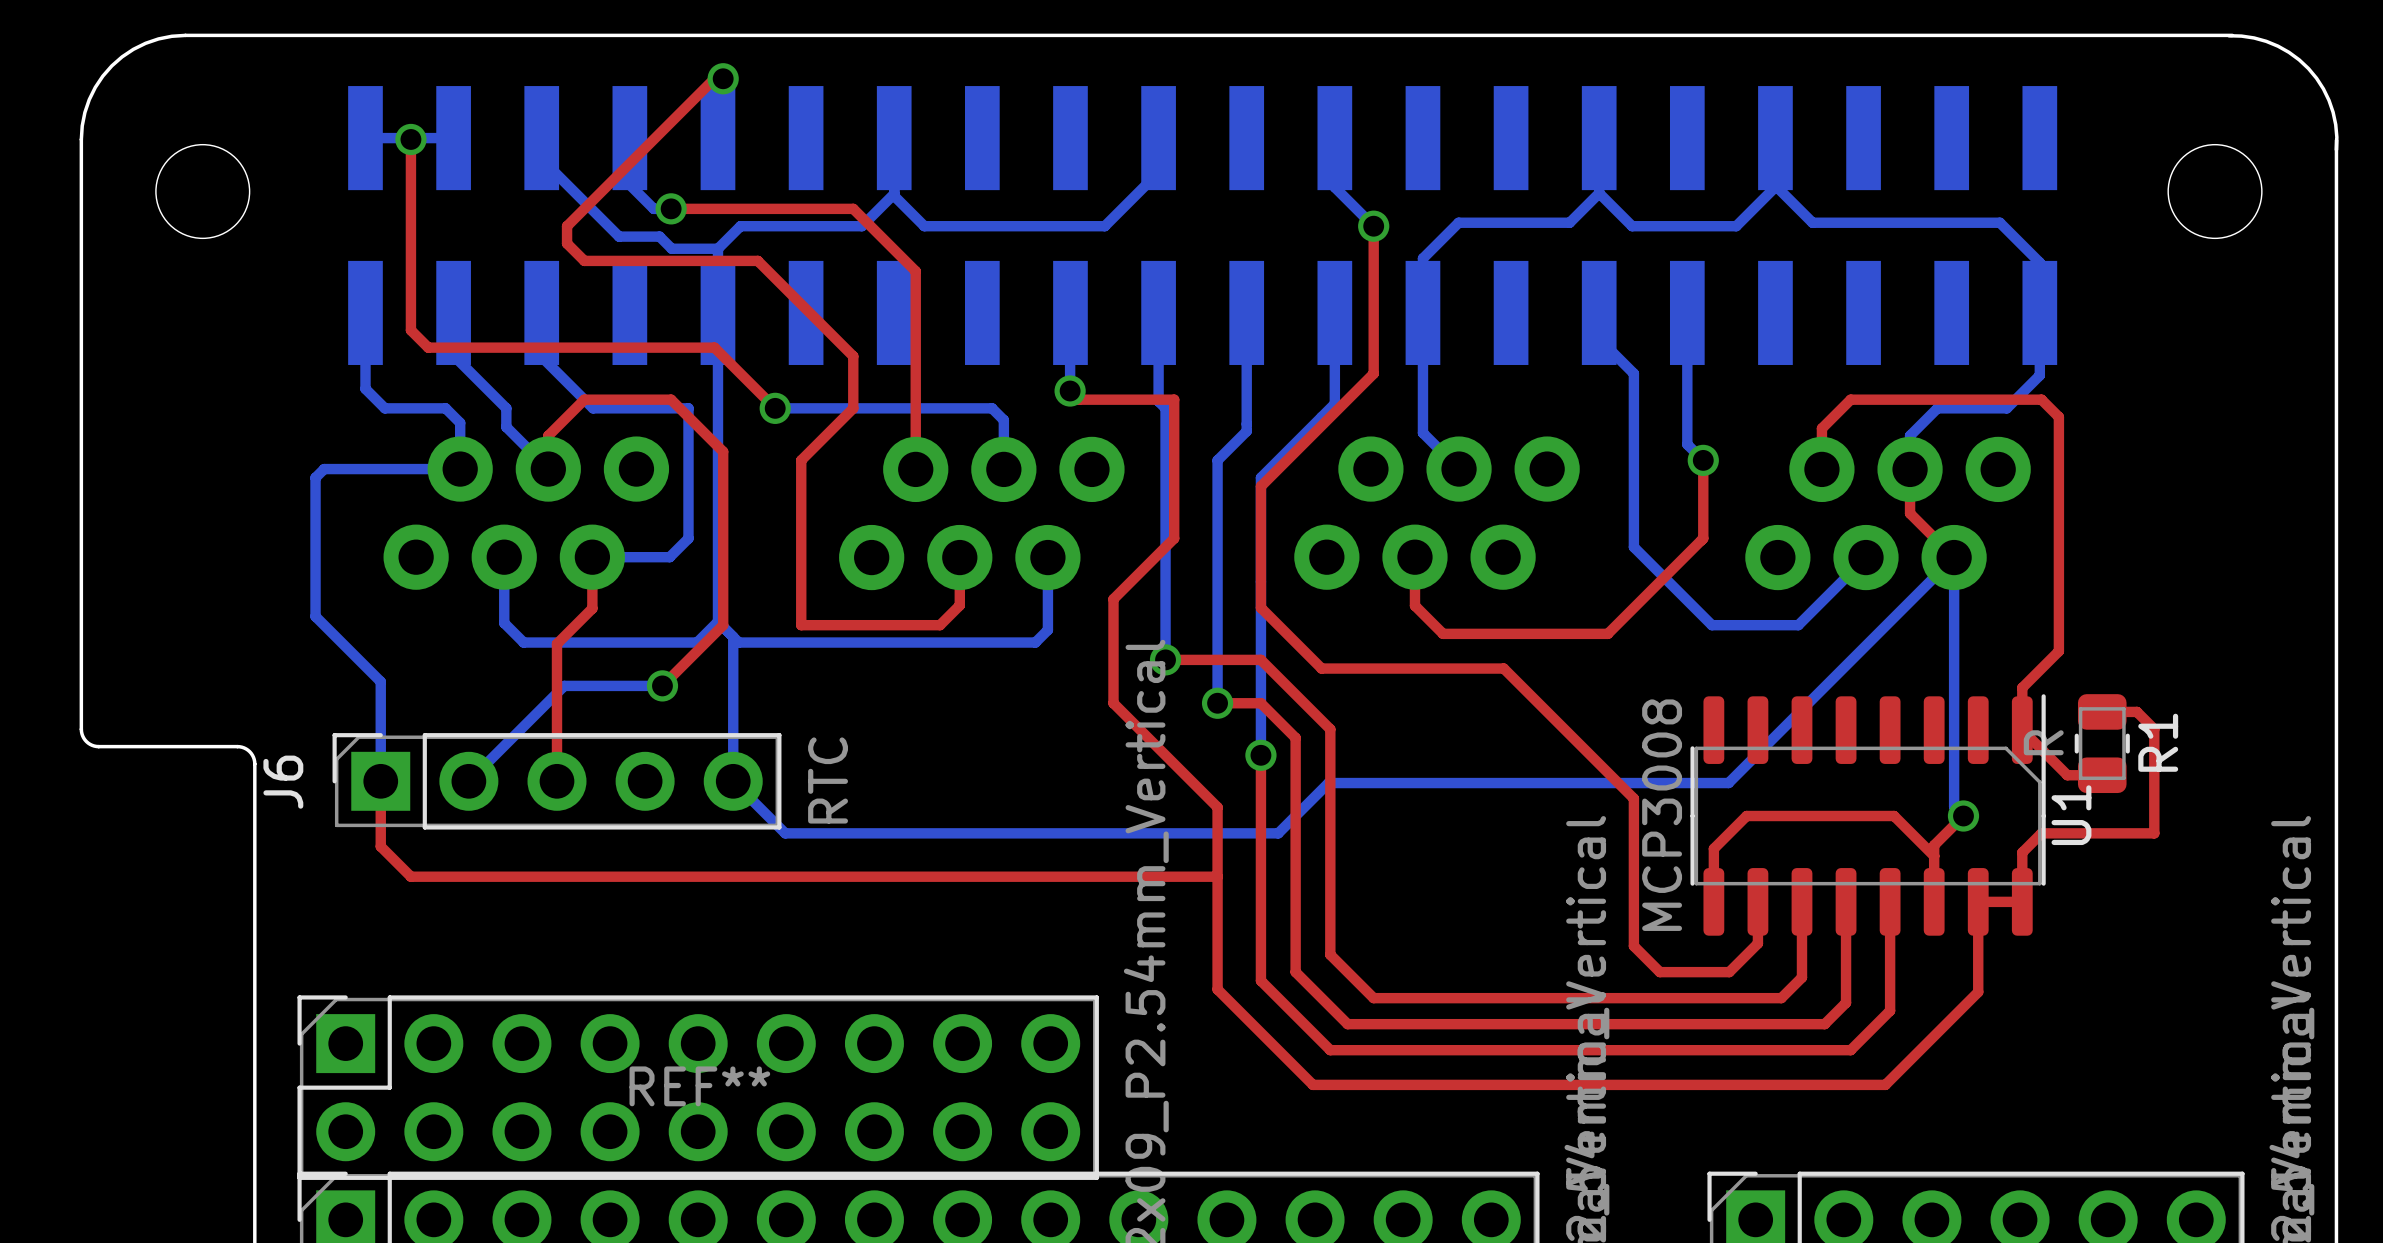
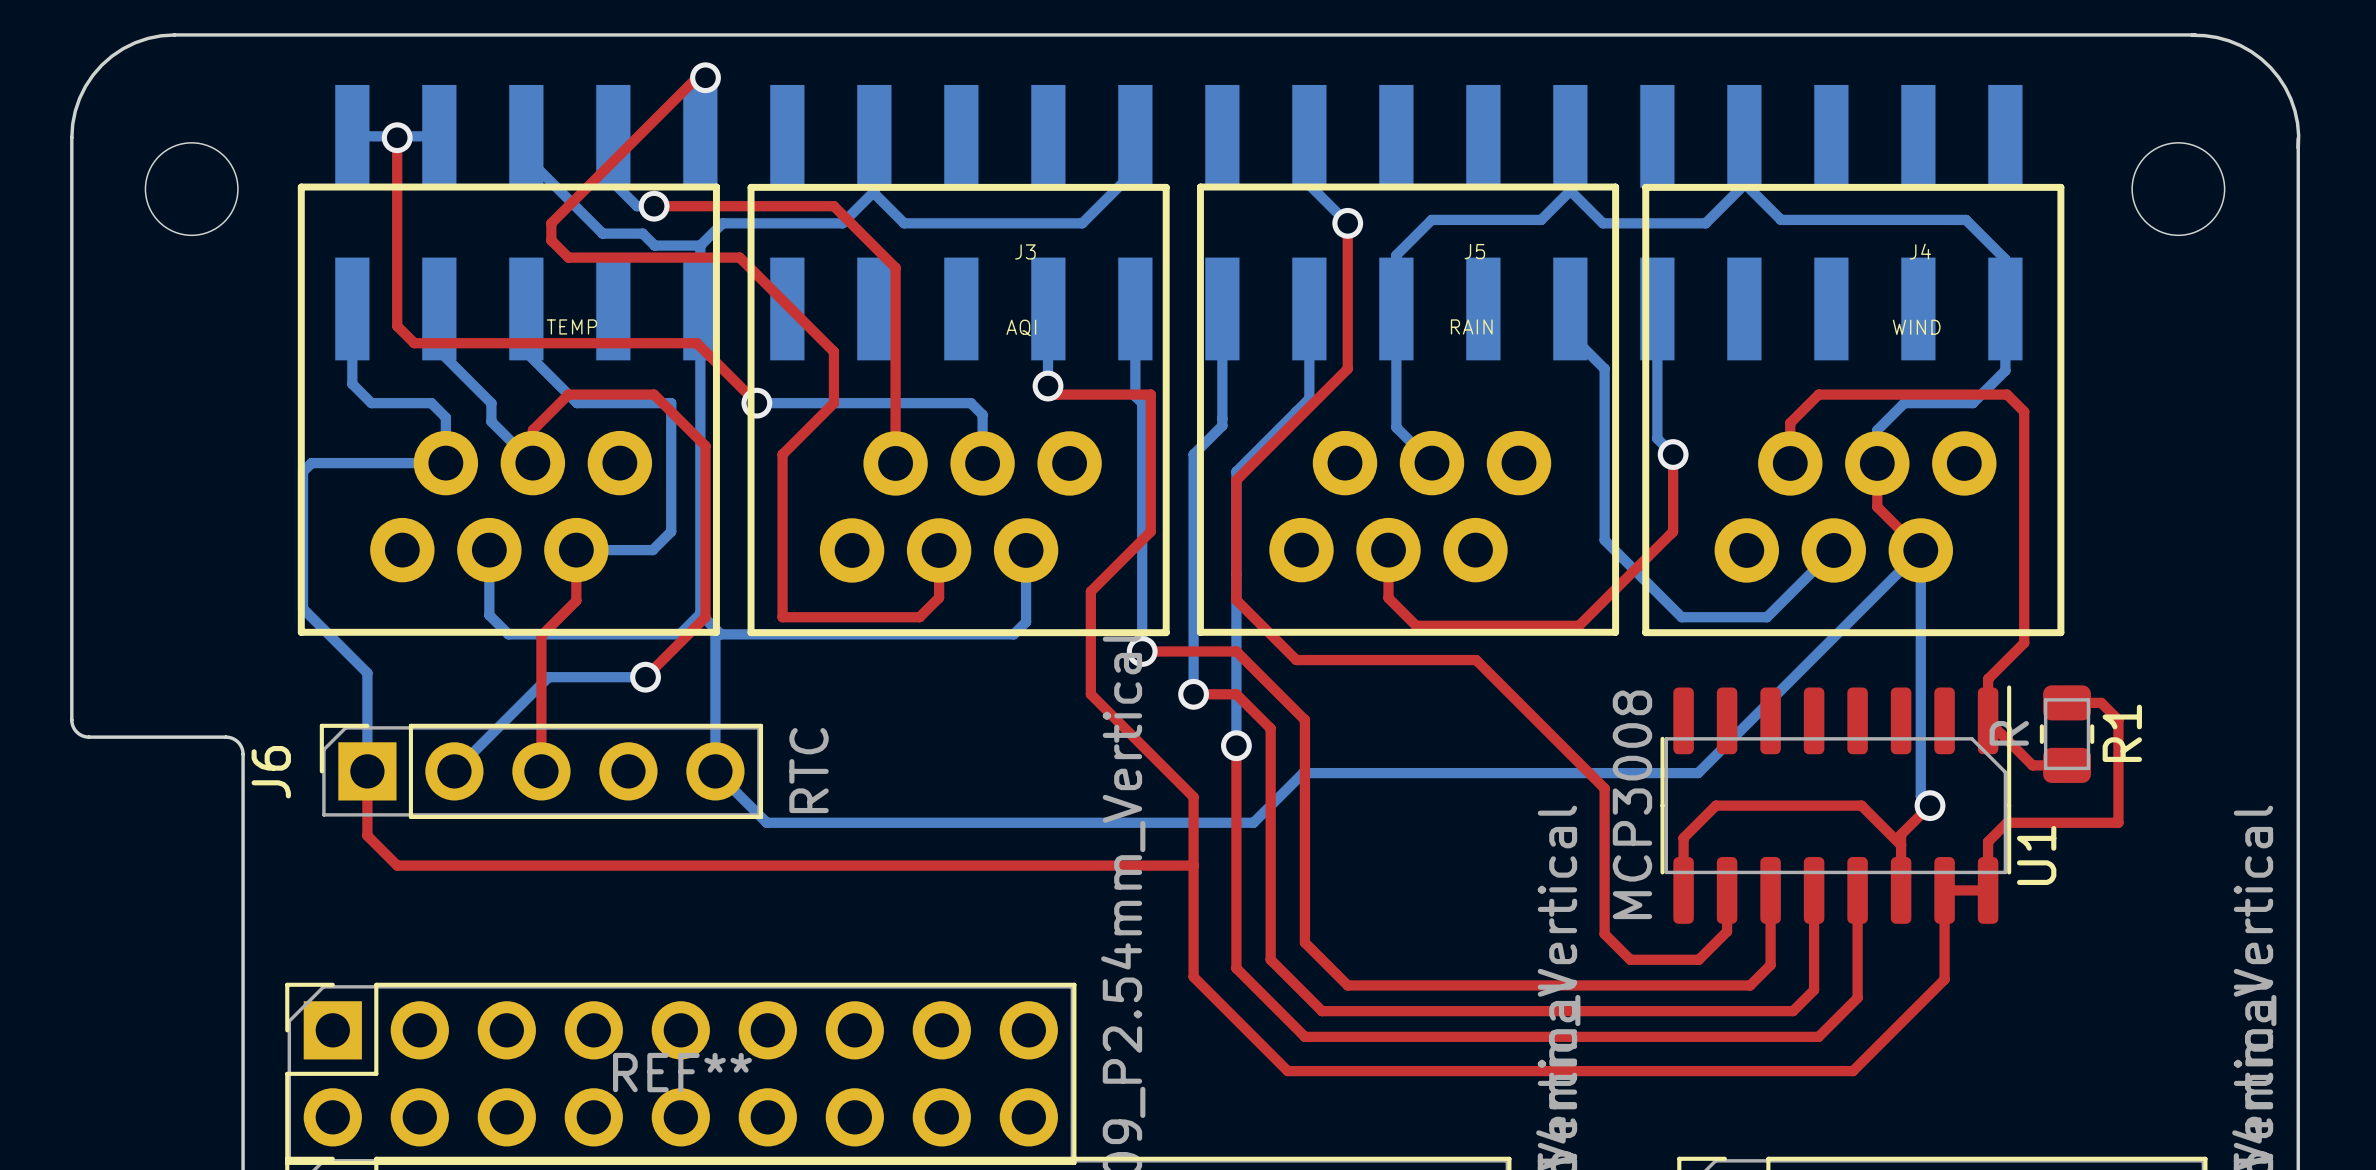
part: none -> TEMP (508, 409)
J5: none -> RAIN (1408, 409)
J3: none -> AQI (958, 410)
J4: none -> WIND (1853, 410)
U1 name position: U1 (2071, 815) -> U1 (2036, 855)

